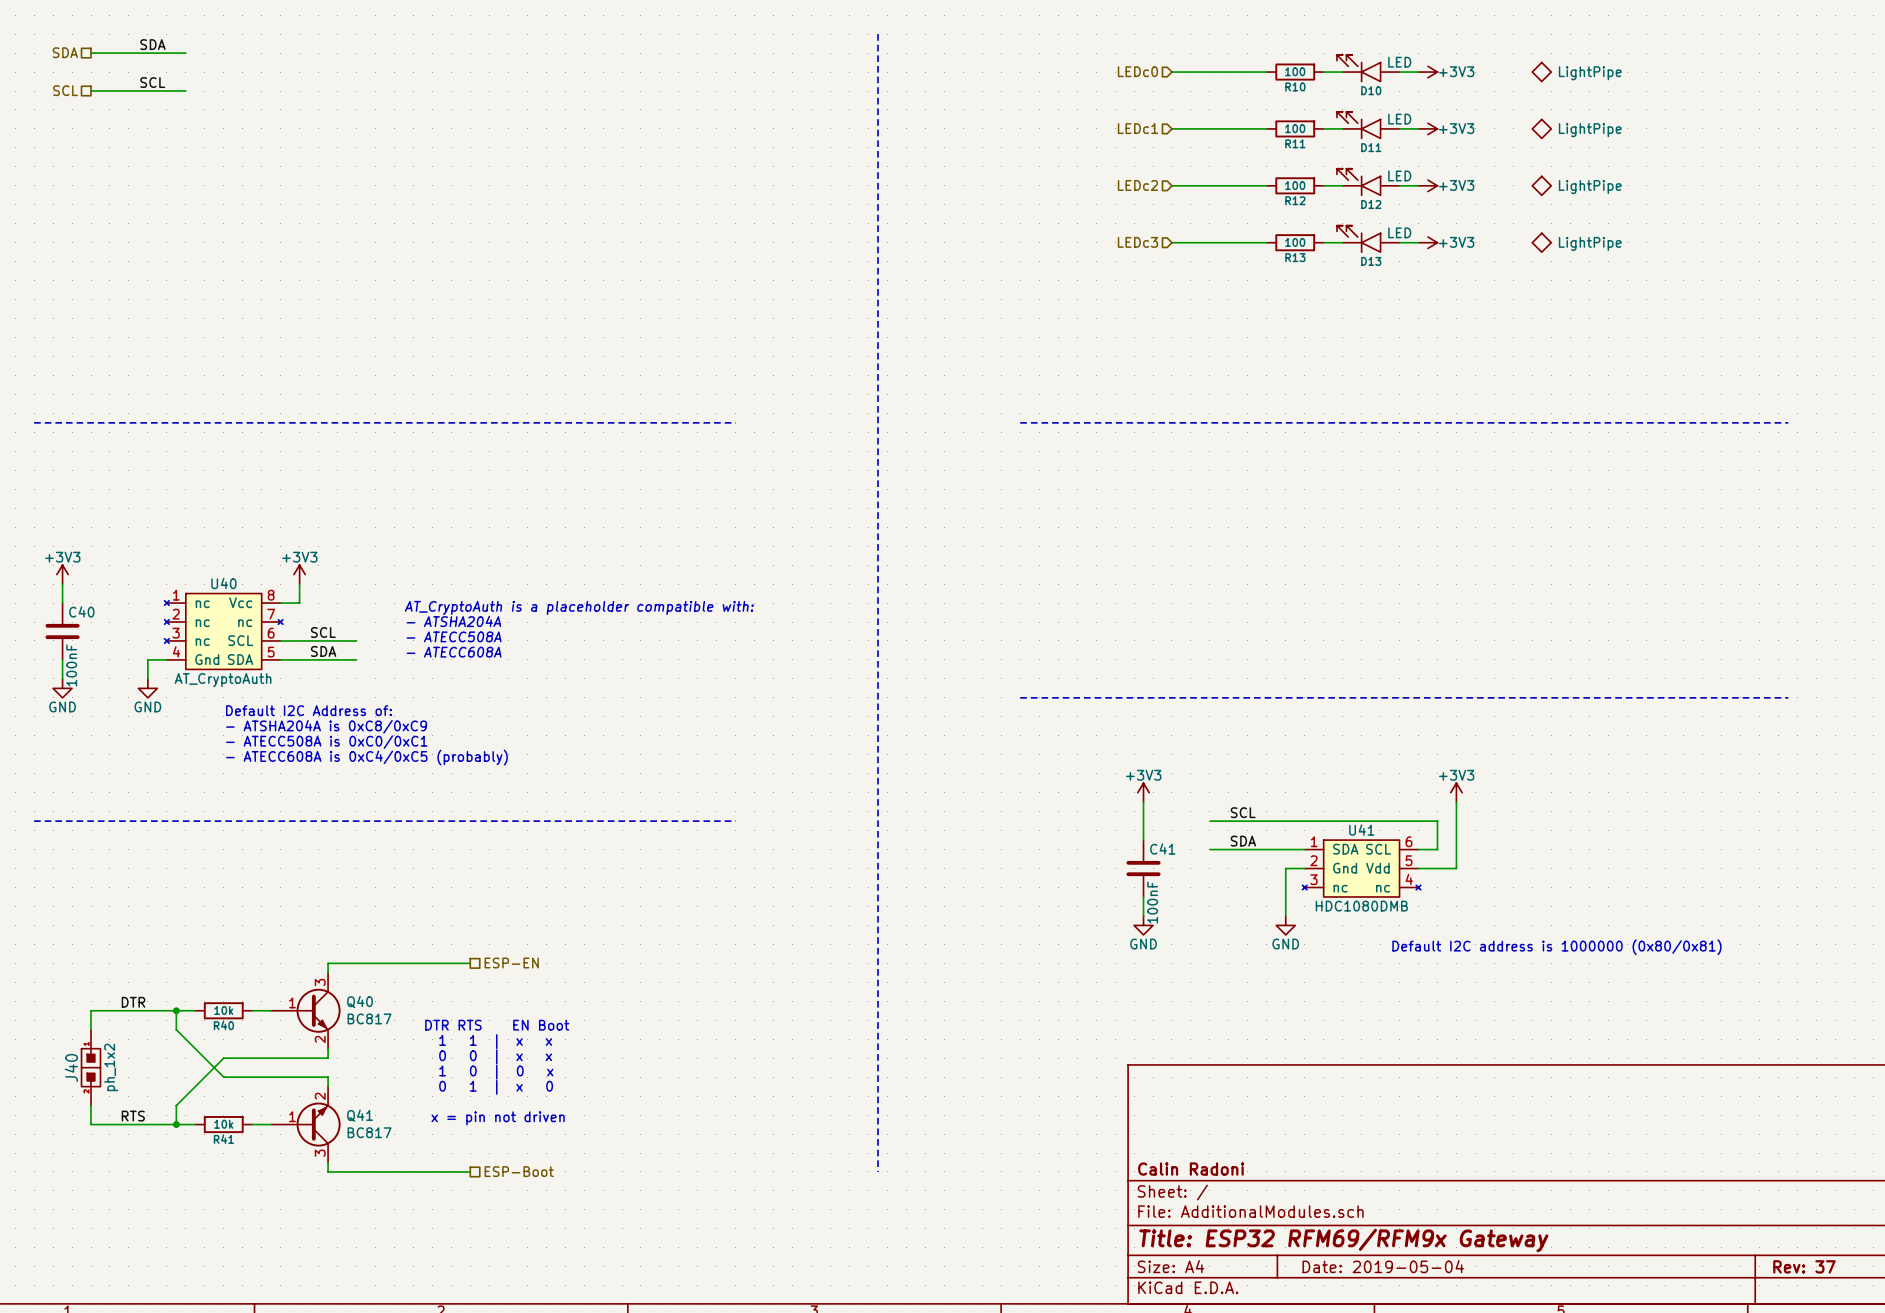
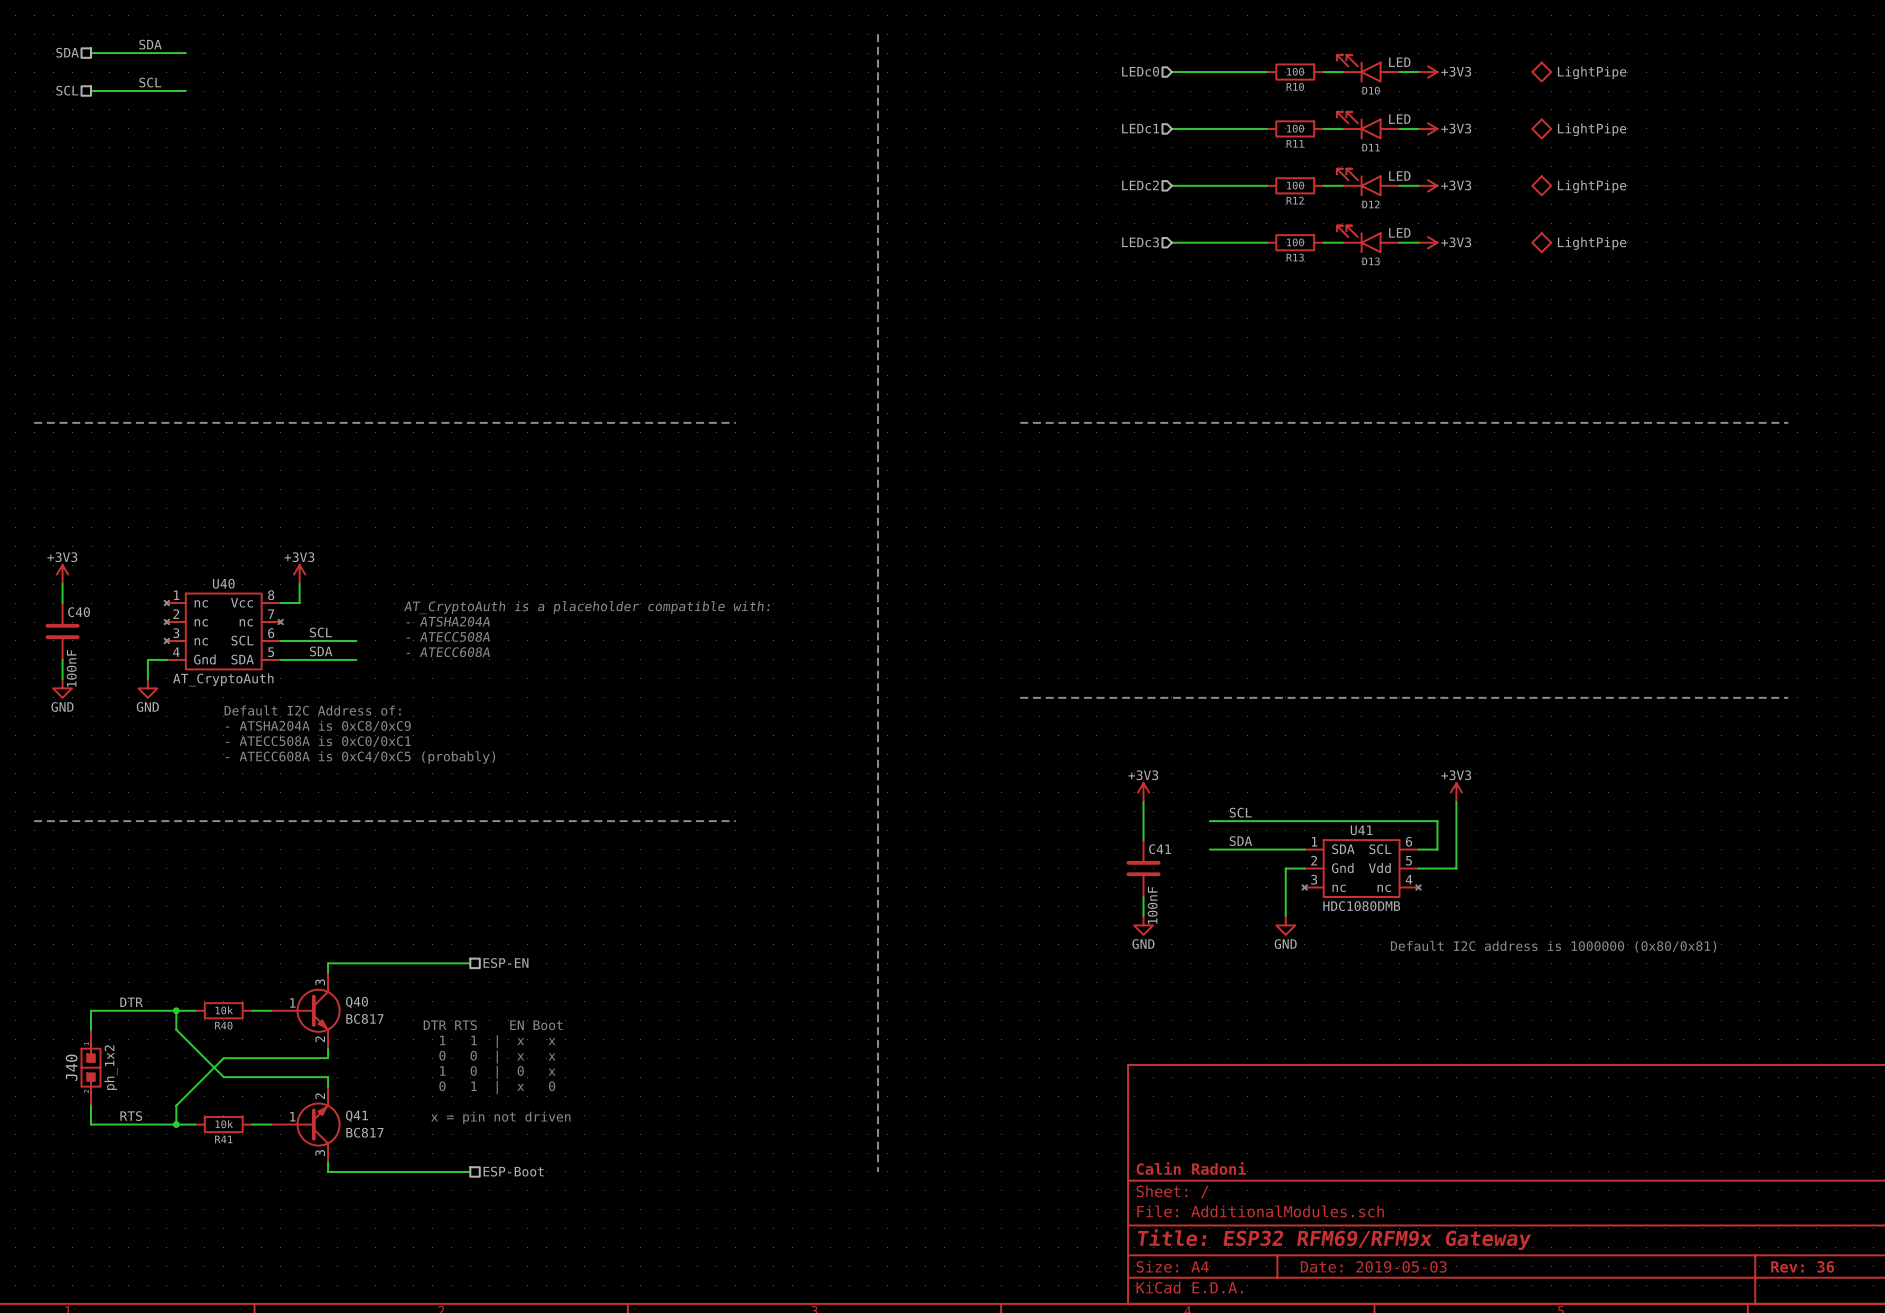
title block: Date: 2019-05-04 (1383, 1266) -> Date: 2019-05-03 (1373, 1266)
title block: Rev: 37 (1804, 1266) -> Rev: 36 (1802, 1266)

